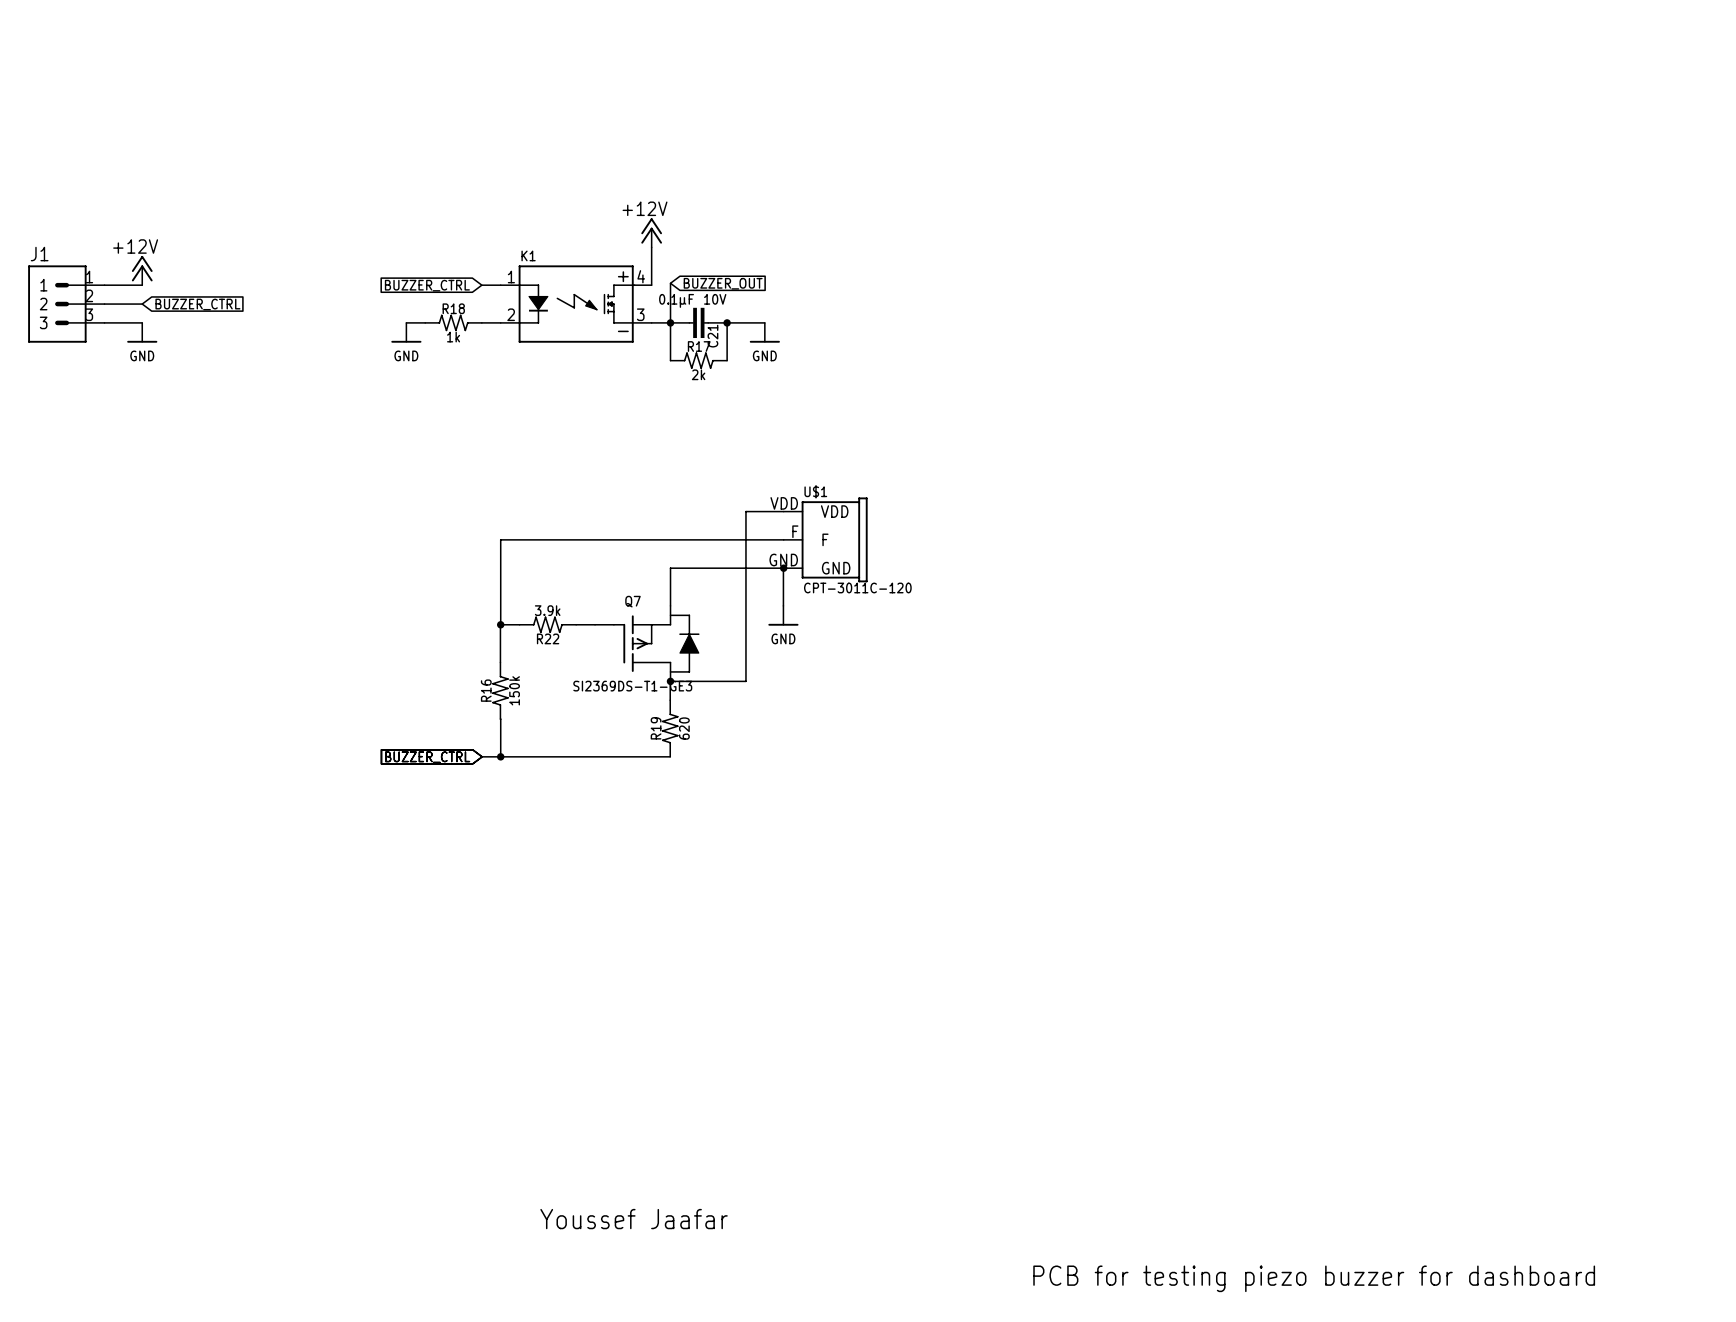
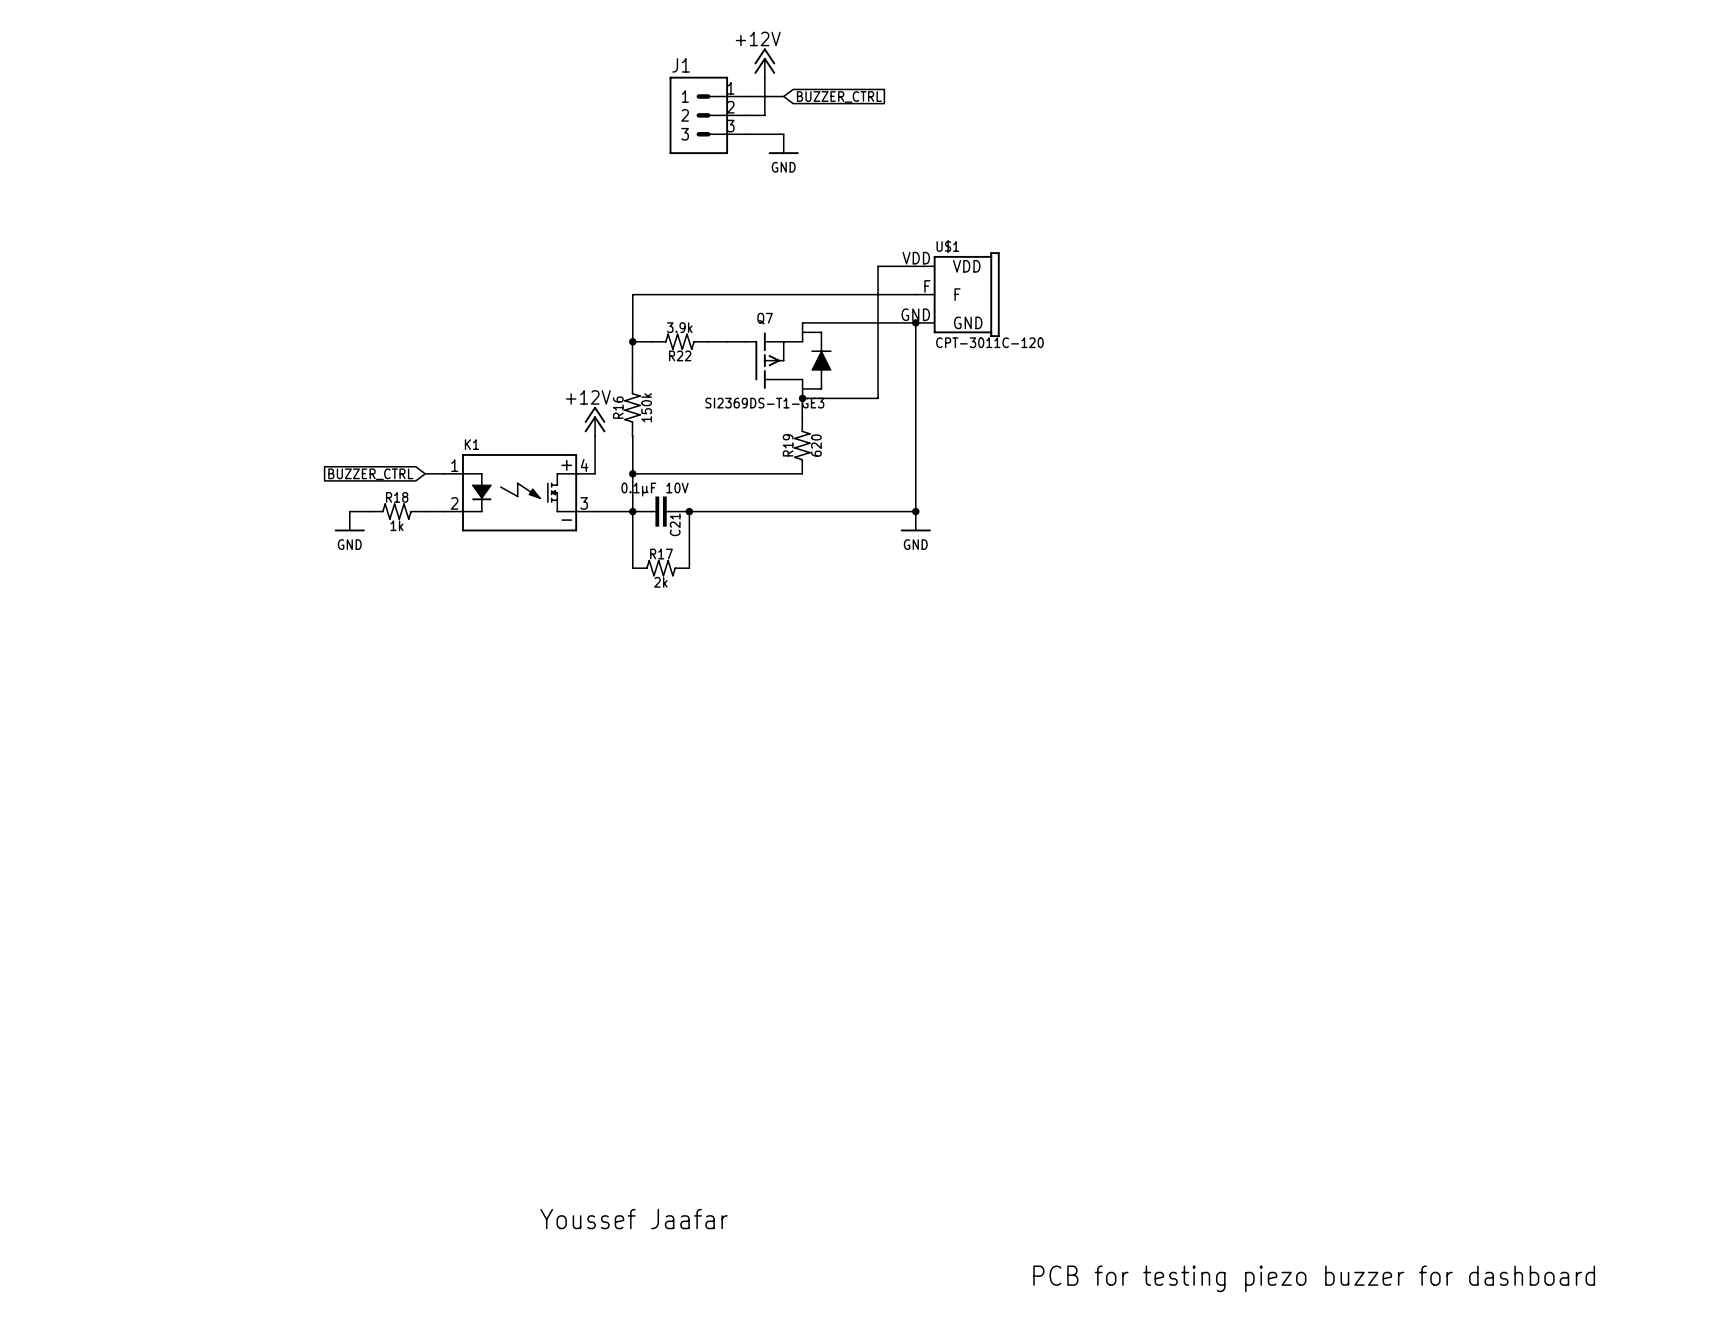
power symbol: none -> +12V (764, 63)
wire: none -> (764, 77) (764, 115) (745, 115)
wire: none -> (745, 96) (783, 96)
global label: none -> BUZZER_CTRL (839, 96)
wire: none -> (745, 134) (783, 134)
power symbol: none -> GND (783, 144)
power symbol: +12V (651, 232) -> none
wire: (651, 247) (651, 285) -> none
wire: none -> (915, 266) (878, 266) (878, 398) (802, 398) (802, 417)
power symbol: +12V (142, 270) -> none
wire: (670, 283) (670, 360) -> none
global label: BUZZER_OUT (723, 283) -> none
wire: (104, 285) (142, 285) -> none
global label: BUZZER_CTRL (427, 285) -> none
wire: (481, 285) (500, 285) -> none
wire: none -> (915, 294) (632, 294) (632, 341)
J1 position: (66, 304) -> (707, 115)
wire: (104, 304) (142, 304) -> none
global label: BUZZER_CTRL (197, 304) -> none
K1 position: (576, 304) -> (519, 492)
wire: (104, 322) (142, 322) -> none
wire: (406, 322) (425, 322) -> (425, 473) (444, 473)
R18 position: (453, 322) -> (396, 511)
wire: (481, 322) (500, 322) -> none
wire: (651, 322) (670, 322) -> (708, 341) (727, 341)
junction position: (670, 322) -> (632, 341)
C21 position: (698, 322) -> (661, 511)
junction: (727, 322) -> none
wire: (764, 322) (727, 322) (727, 360) -> none
wire: none -> (802, 322) (915, 322) (915, 511) (783, 511)
junction: none -> (915, 322)
power symbol: GND (142, 332) -> none
power symbol: GND (406, 332) -> none
power symbol: GND (764, 332) -> none
wire: none -> (651, 341) (632, 341) (632, 379)
R17 position: (698, 360) -> (661, 568)
junction: none -> (802, 398)
power symbol: none -> +12V (595, 421)
wire: none -> (595, 436) (595, 473)
wire: none -> (632, 436) (632, 568)
wire: none -> (632, 473) (802, 473)
junction: none -> (632, 473)
global label: none -> BUZZER_CTRL (370, 474)
wire: none -> (349, 511) (368, 511)
wire: none -> (425, 511) (444, 511)
wire: none -> (595, 511) (632, 511)
junction: none -> (632, 511)
junction: none -> (689, 511)
wire: (745, 511) (745, 681) (670, 681) (670, 700) -> (745, 511) (689, 511) (689, 568)
junction: none -> (915, 511)
power symbol: none -> GND (349, 521)
power symbol: none -> GND (915, 521)
wire: (783, 539) (500, 539) (500, 624) -> none
U$1 position: (825, 539) -> (957, 294)
wire: (783, 568) (783, 605) -> none
wire: (783, 568) (670, 568) (670, 605) -> none
junction: (783, 568) -> none
power symbol: GND (783, 615) -> none
junction: (500, 624) -> none
wire: (519, 624) (500, 624) (500, 662) -> none
R22 position: (547, 624) -> (679, 341)
wire: (576, 624) (595, 624) -> none
Q7 position: (647, 643) -> (779, 360)
junction: (670, 681) -> none
R16 position: (500, 690) -> (632, 407)
wire: (500, 719) (500, 756) -> none
R19 position: (670, 728) -> (802, 445)
wire: (481, 756) (670, 756) -> none
junction: (500, 756) -> none
global label: BUZZER_CTRL (427, 757) -> none

